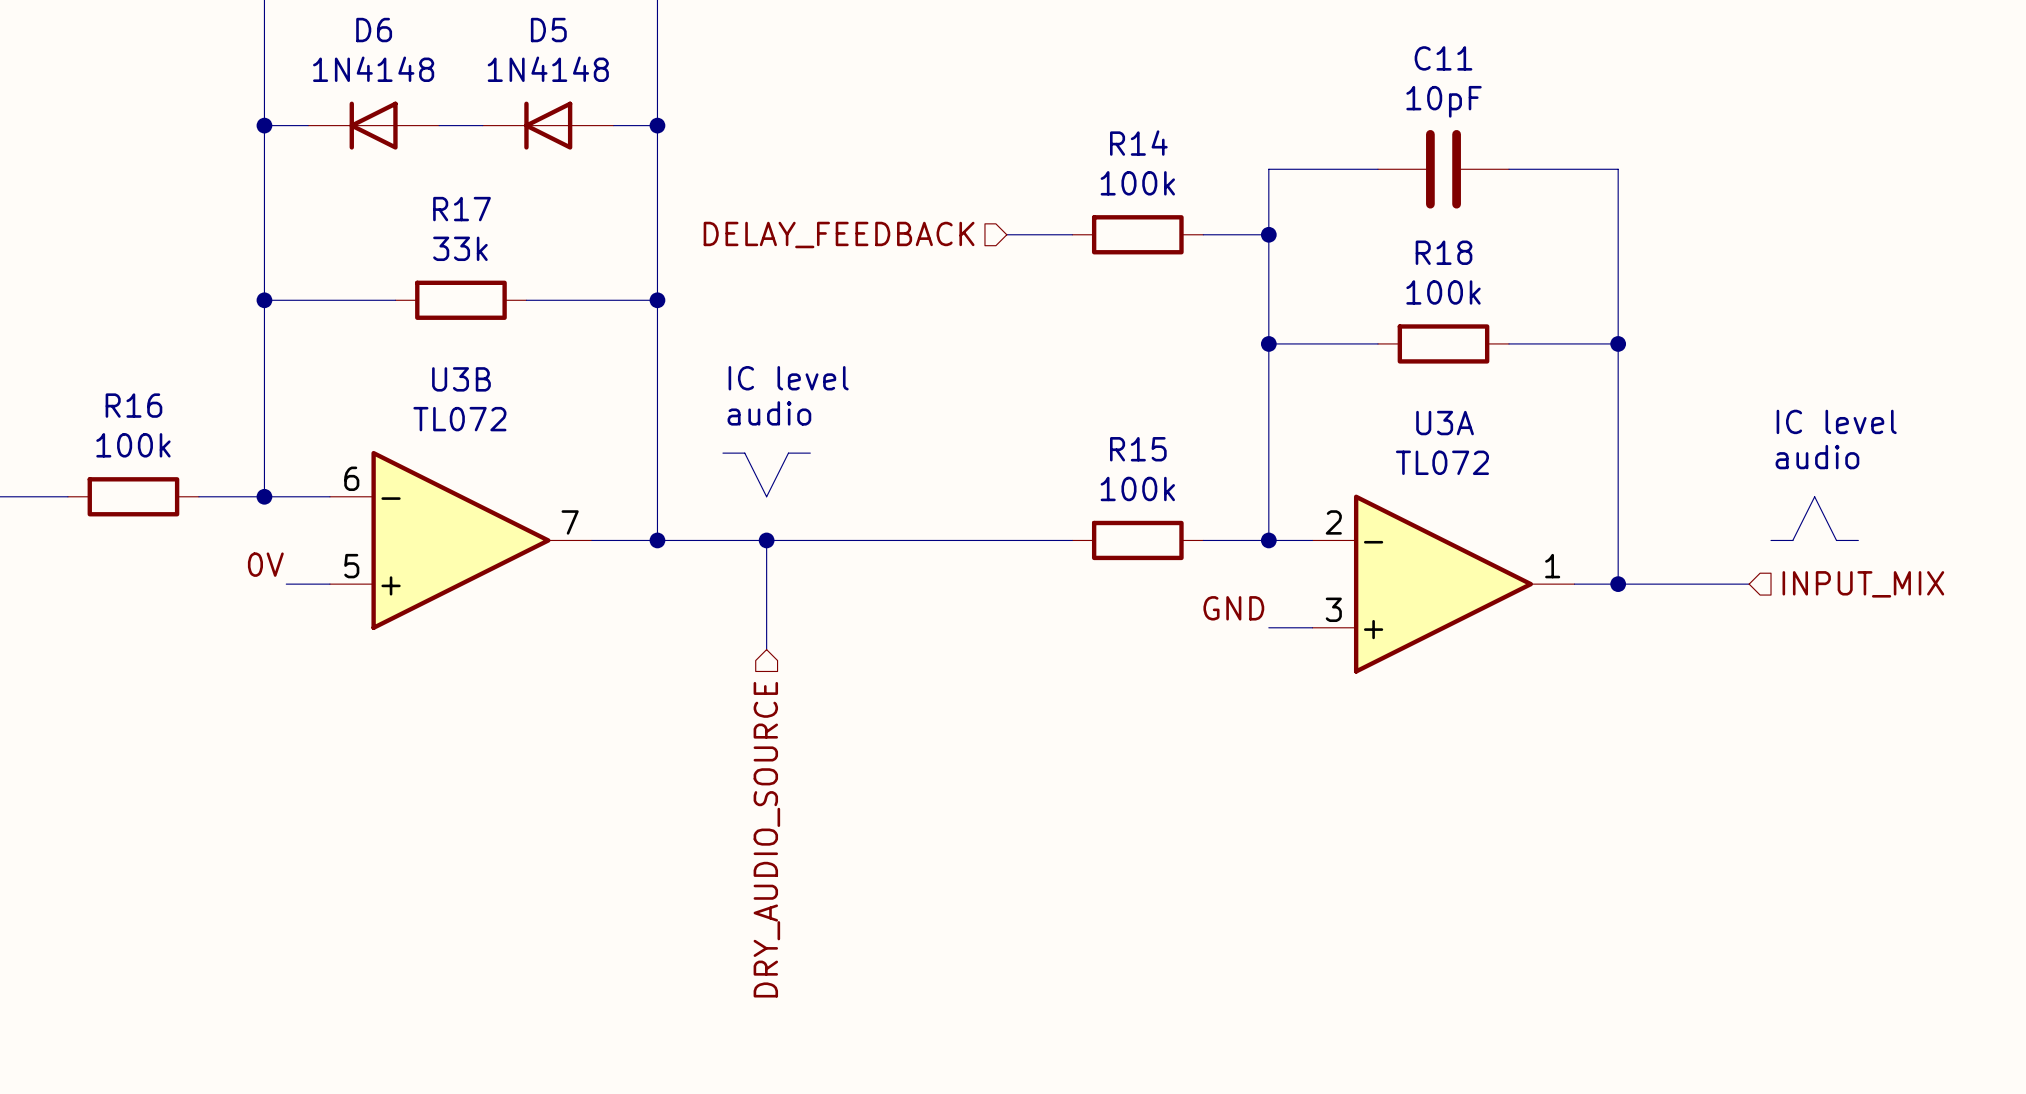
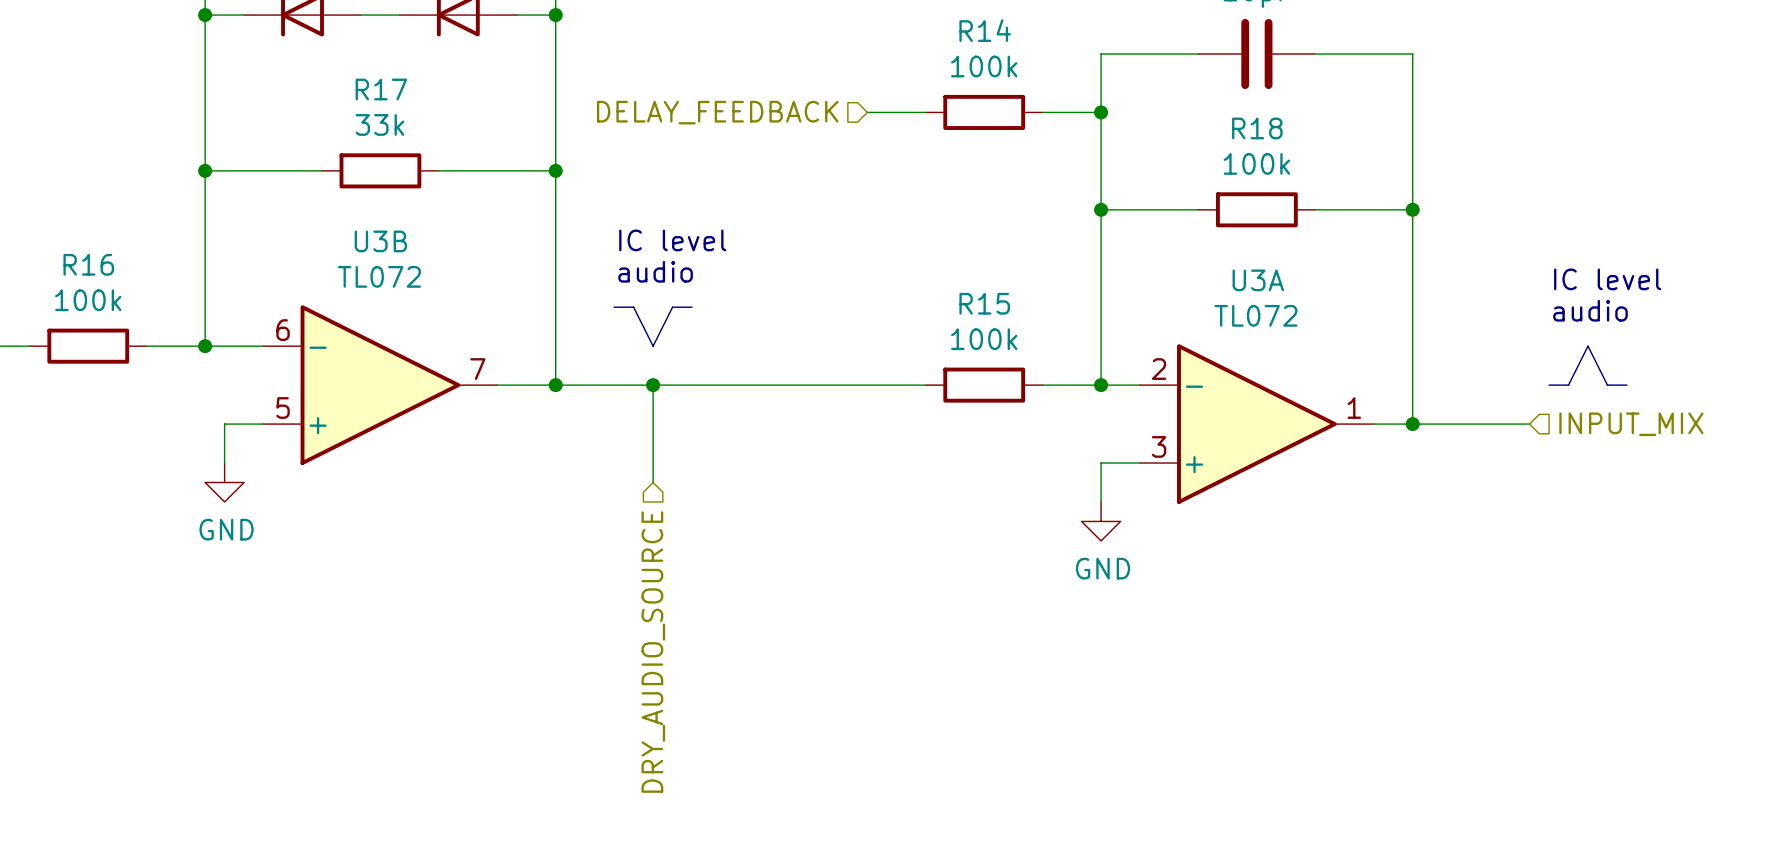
label: 0V (265, 564) -> none
wire: none -> (224, 424) (224, 463)
label: GND (1233, 608) -> none
wire: none -> (1101, 463) (1101, 501)
power symbol: none -> GND (224, 482)
power symbol: none -> GND (1101, 521)

